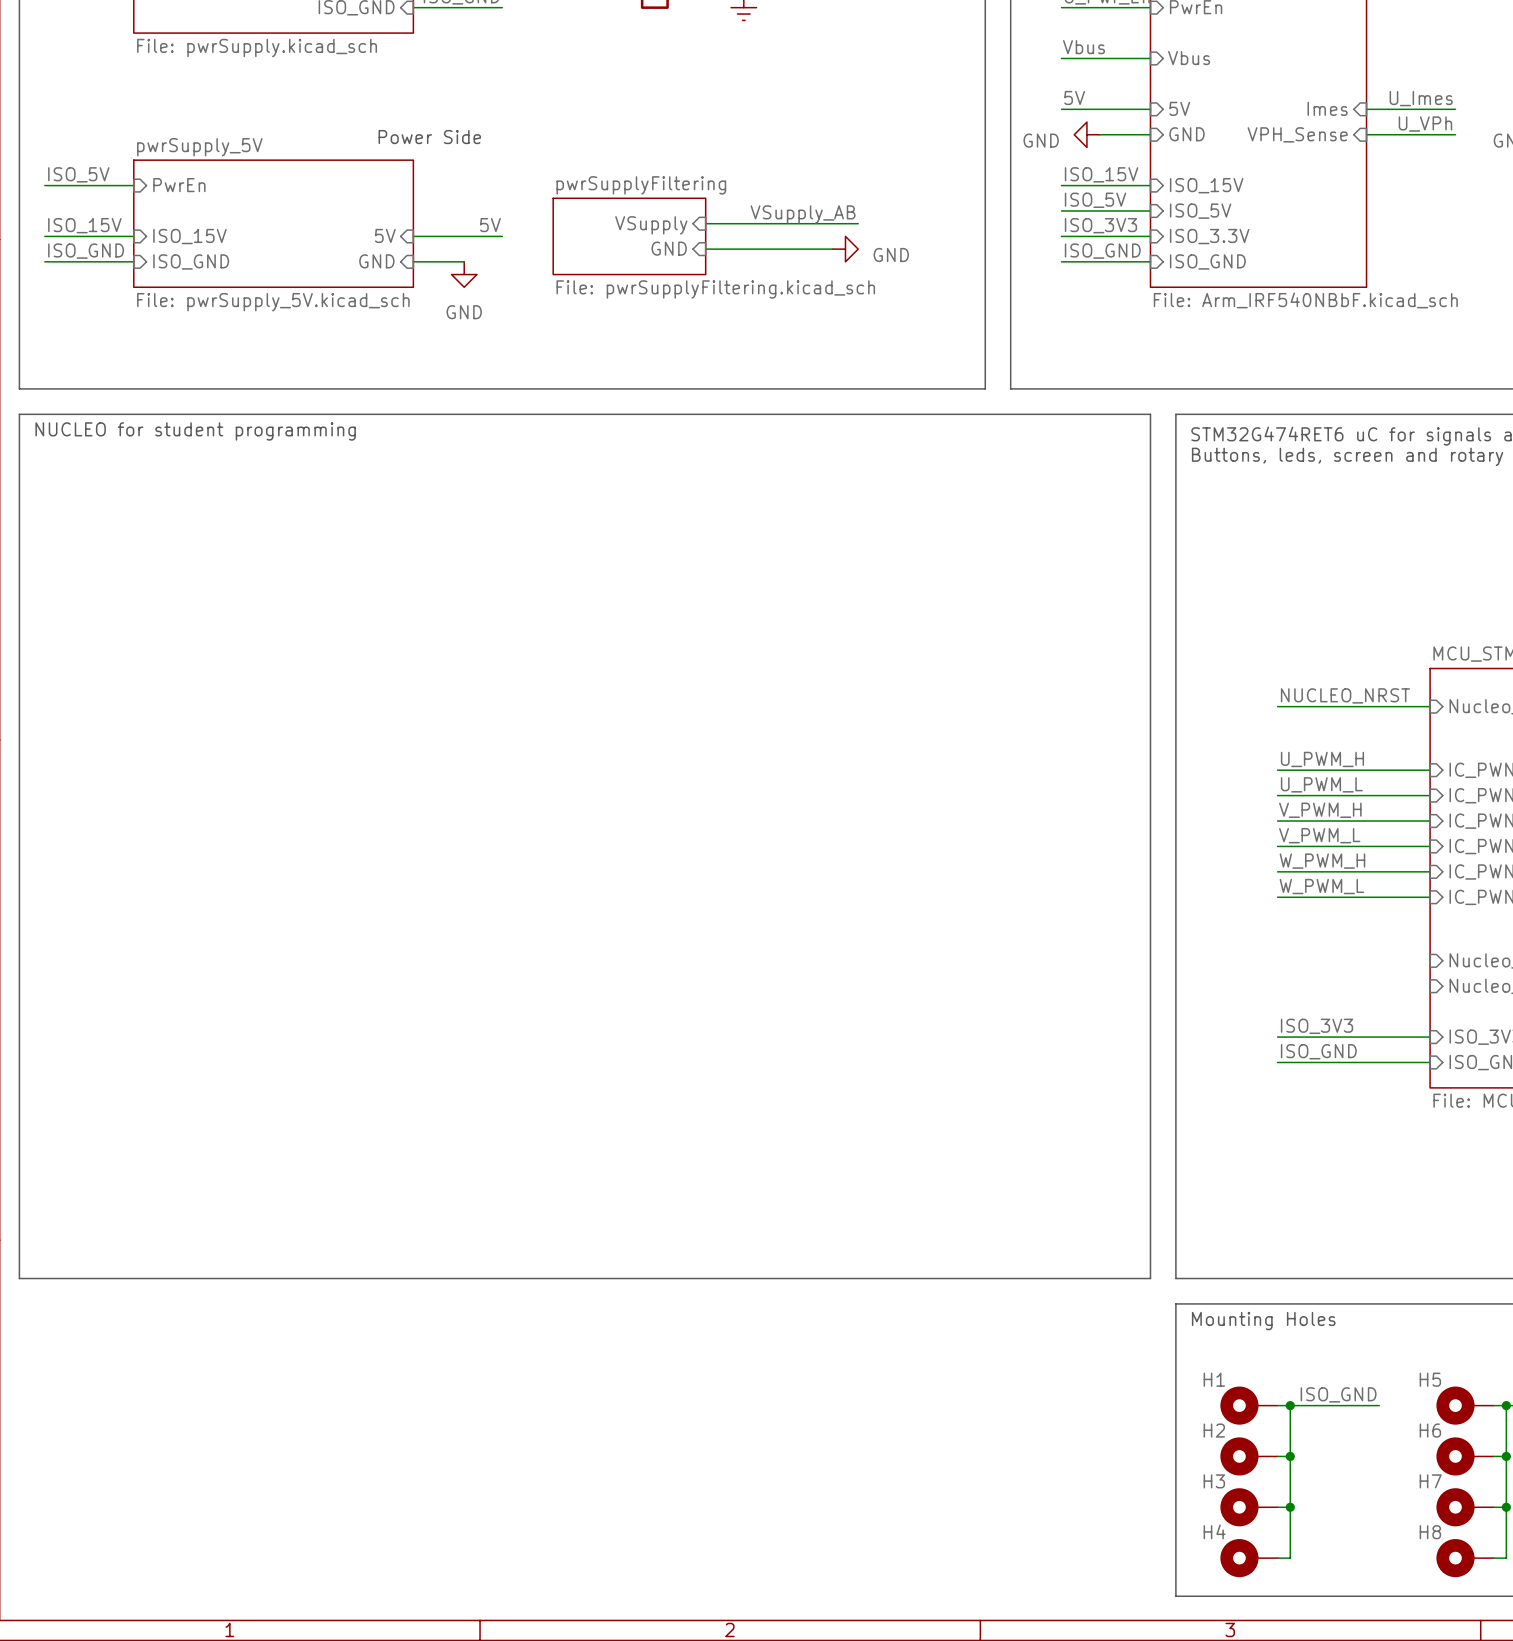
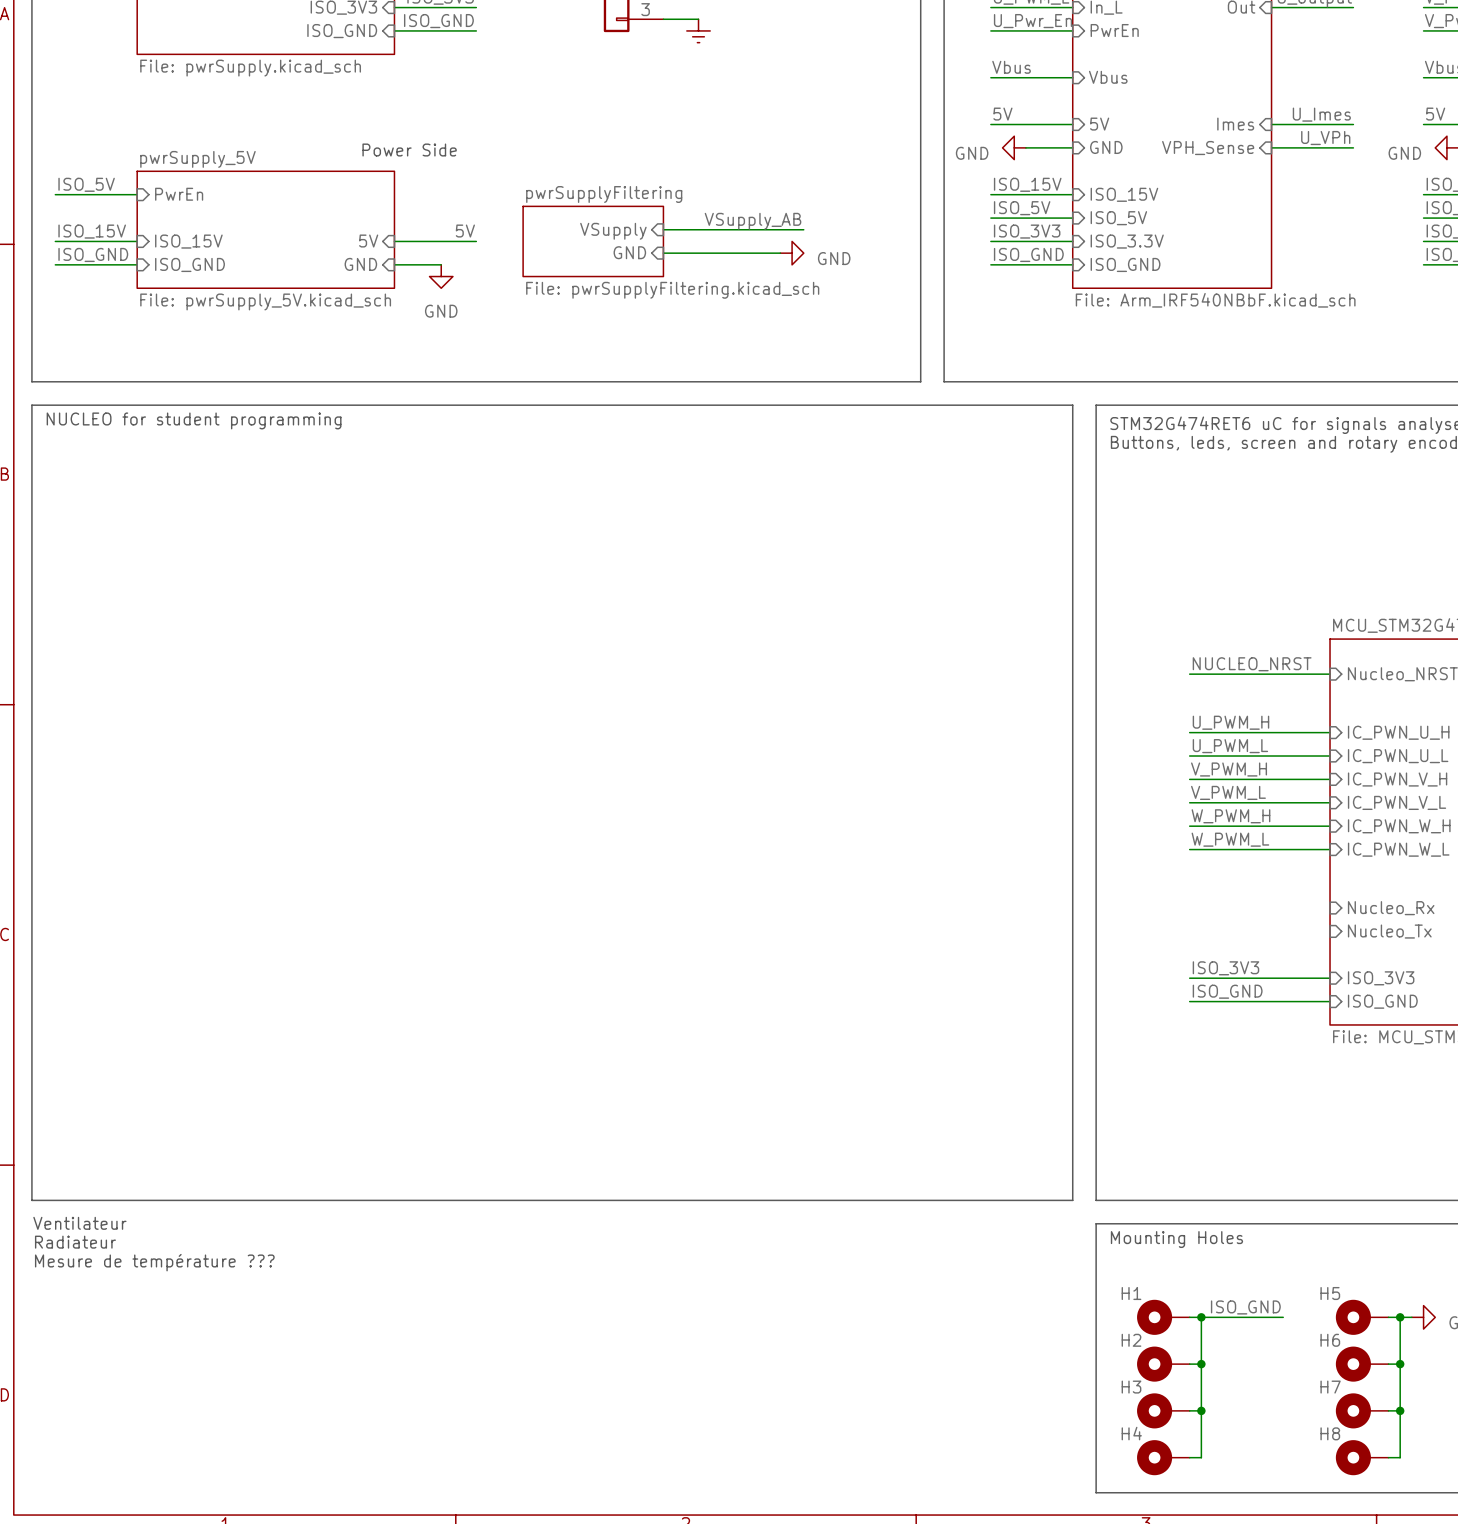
text: none -> Ventilateur (79, 1223)
text: none -> Radiateur (75, 1242)
text: none -> Mesure de température ??? (154, 1262)

